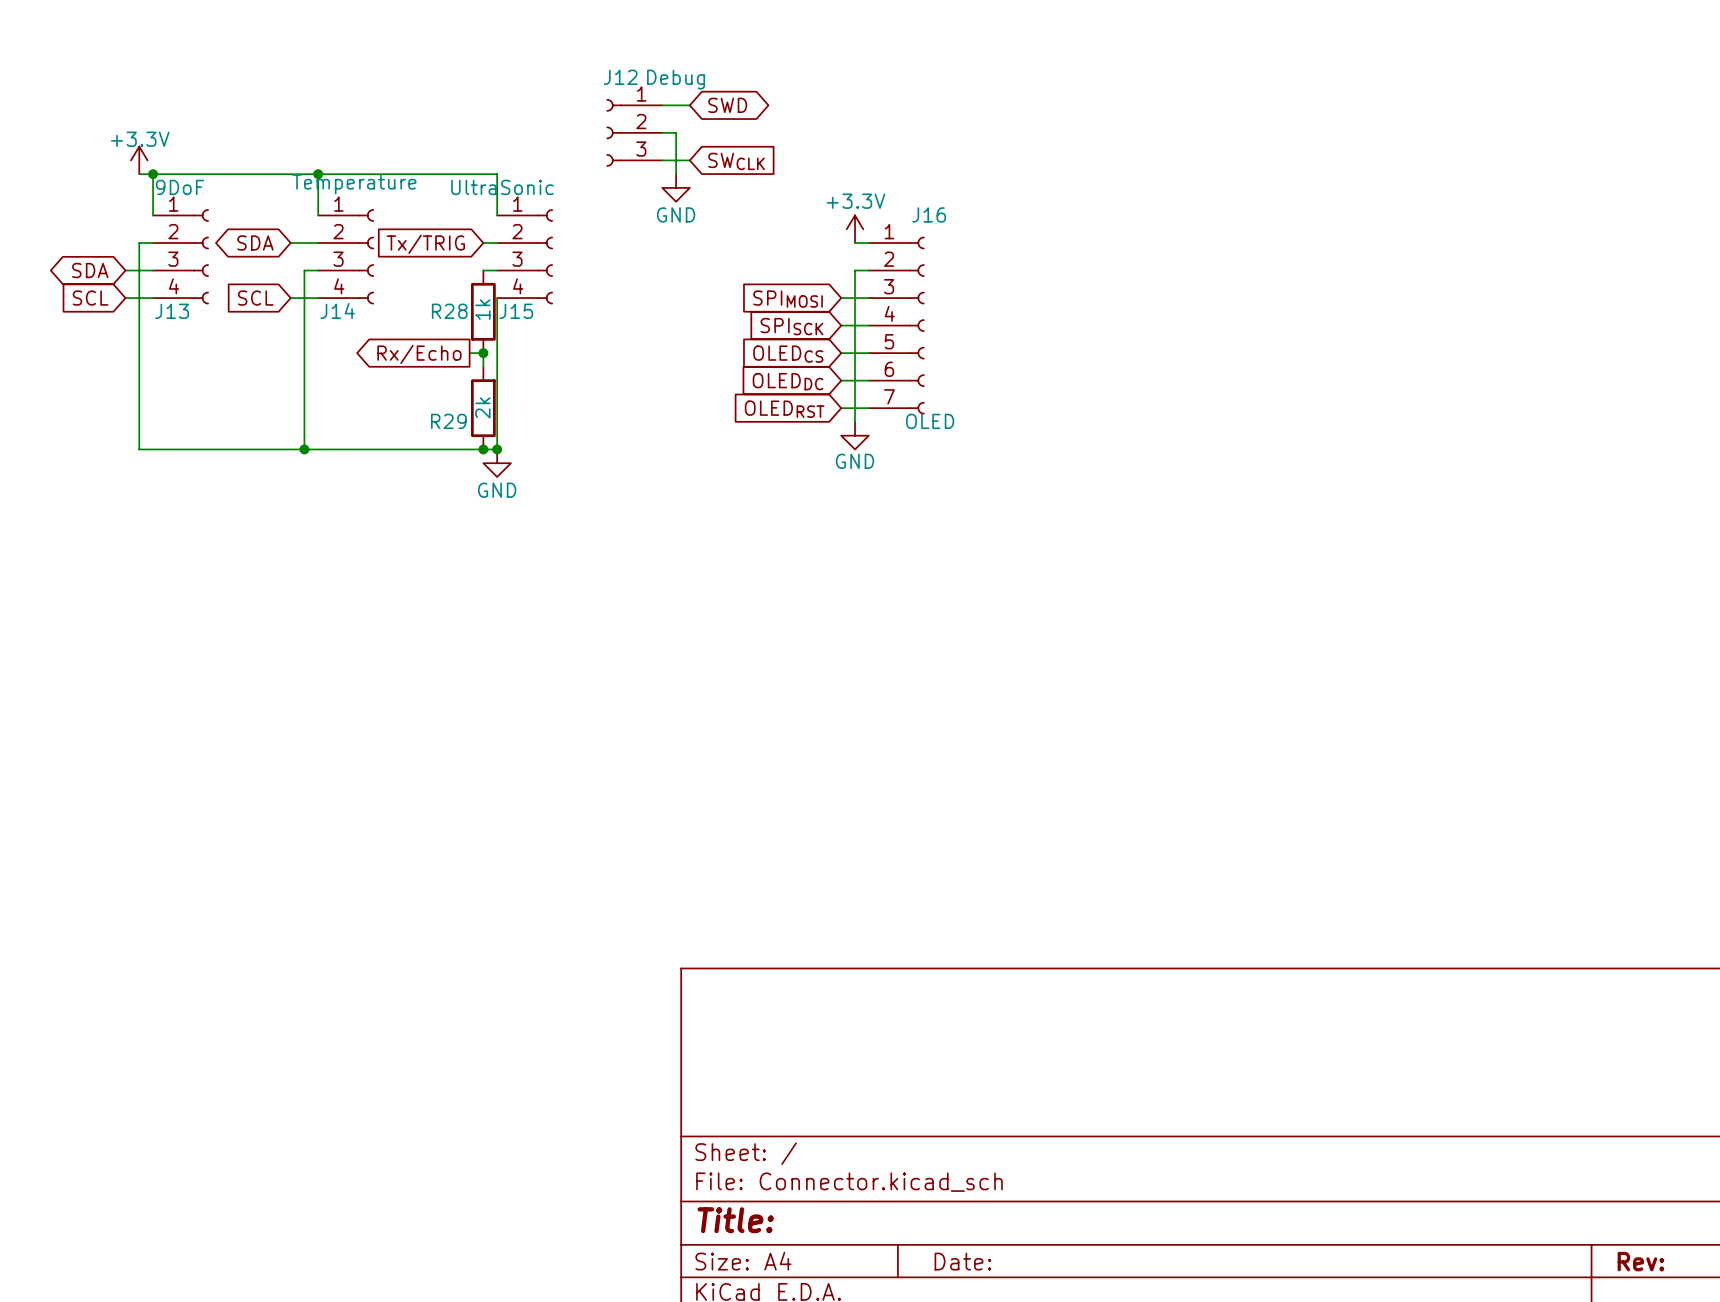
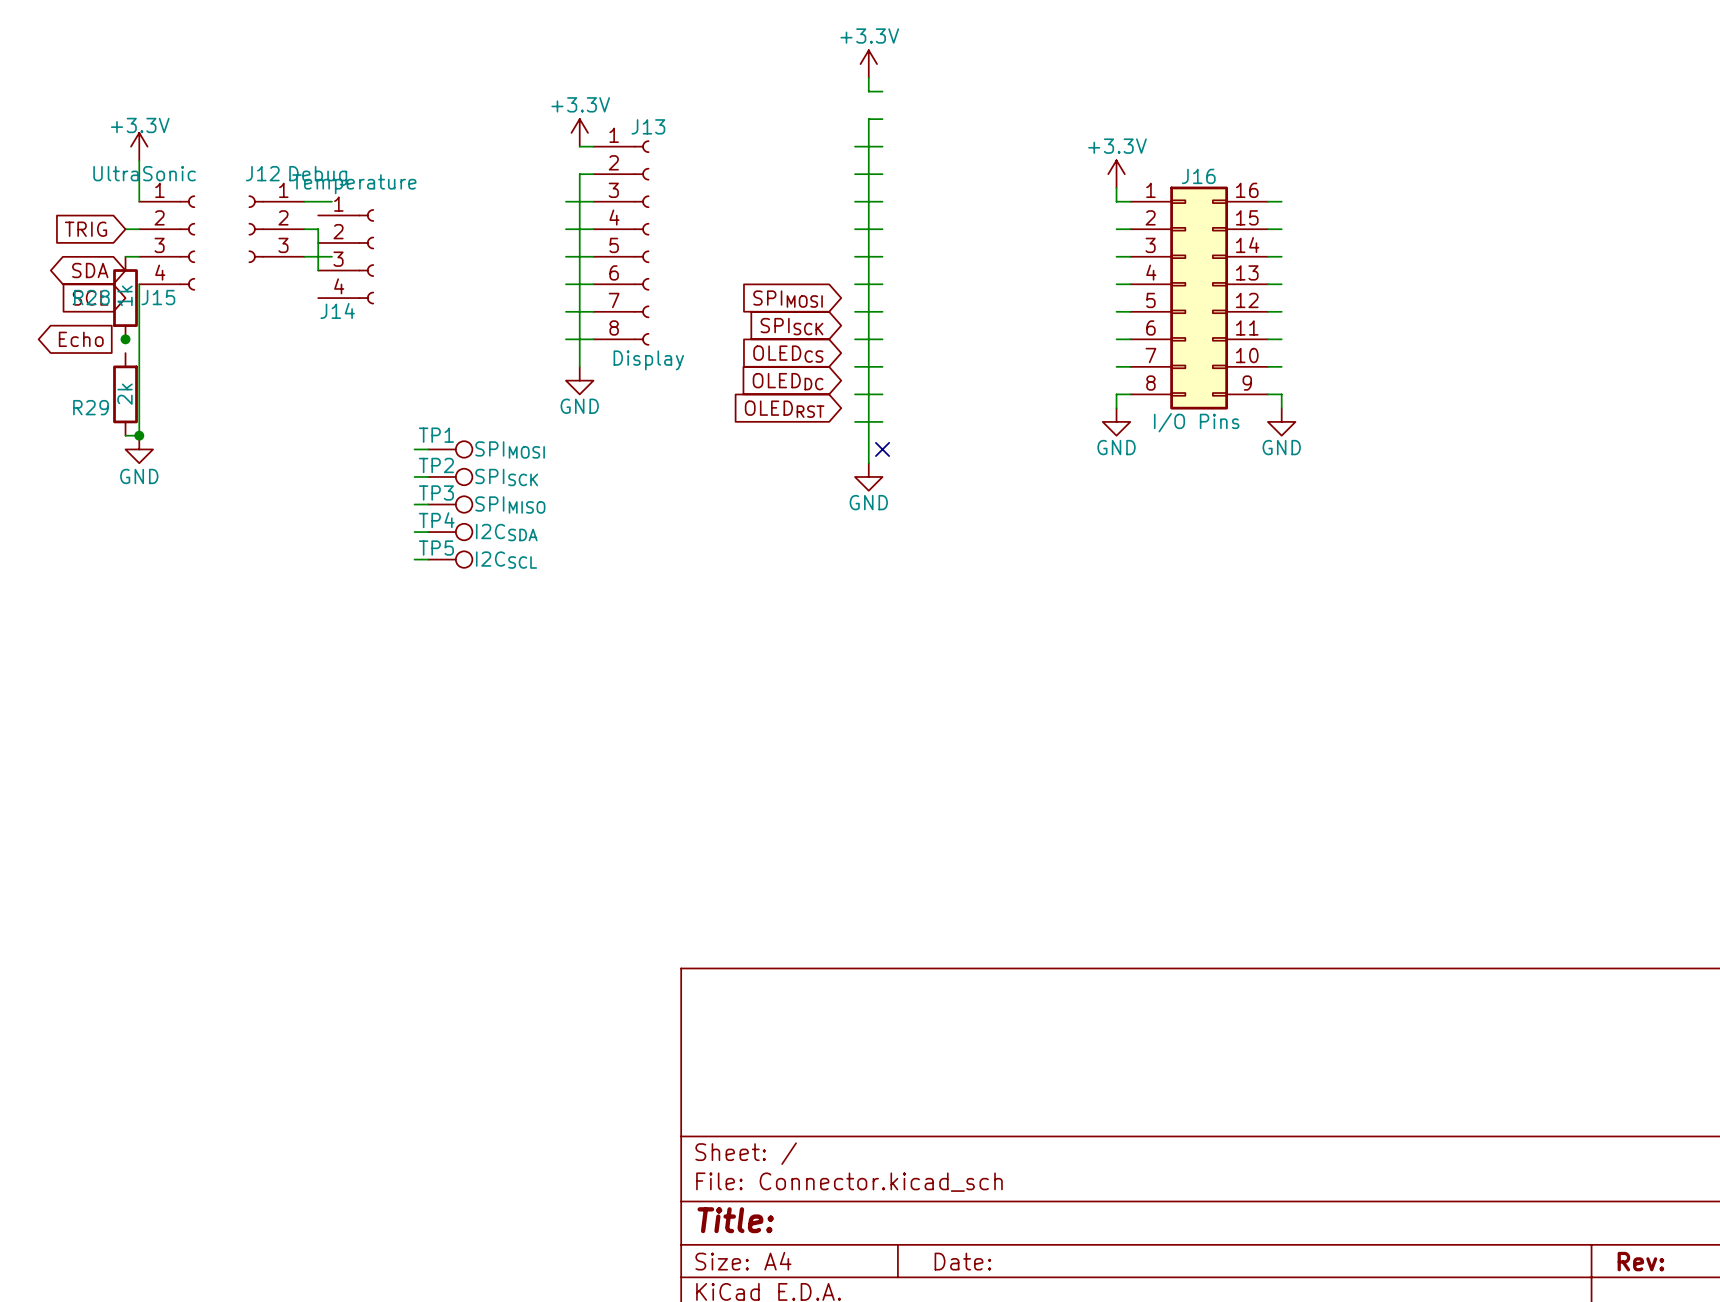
power symbol: none -> +3.3V (868, 64)
wire: none -> (868, 77) (868, 91) (882, 91)
wire: (662, 105) (689, 105) -> (565, 201) (593, 201)
global label: SWD (727, 105) -> none
wire: none -> (882, 119) (868, 119) (868, 463)
power symbol: none -> +3.3V (579, 132)
J12 position: (634, 132) -> (276, 229)
wire: (662, 132) (676, 132) (676, 174) -> none
wire: none -> (579, 146) (593, 146)
wire: none -> (855, 146) (882, 146)
power symbol position: +3.3V (139, 160) -> +3.3V (139, 146)
wire: (662, 160) (689, 160) -> (565, 256) (593, 256)
global label: SWCLK (736, 161) -> none
wire: (139, 174) (497, 174) (497, 215) -> none
wire: (153, 174) (153, 215) -> (139, 160) (139, 201)
junction: (153, 174) -> none
wire: (318, 174) (318, 215) -> none
junction: (318, 174) -> none
wire: none -> (593, 174) (579, 174) (579, 366)
wire: none -> (855, 174) (882, 174)
power symbol: none -> +3.3V (1116, 174)
J13 value: 9DoF (180, 187) -> Display (648, 360)
power symbol: GND (676, 187) -> none
wire: none -> (1116, 187) (1116, 201) (1130, 201)
wire: none -> (855, 201) (882, 201)
wire: none -> (1267, 201) (1281, 201)
J13 symbol: [153, 209, 209, 305] -> [593, 140, 650, 346]
J16 name position: J16 (929, 214) -> J16 (1198, 176)
global label: none -> TRIG (86, 229)
wire: none -> (125, 229) (139, 229)
wire: none -> (565, 229) (593, 229)
wire: none -> (855, 229) (882, 229)
power symbol: +3.3V (855, 229) -> none
wire: none -> (1267, 229) (1281, 229)
J16 symbol: [868, 236, 925, 415] -> [1130, 186, 1268, 410]
wire: (153, 242) (139, 242) (139, 284) -> none
global label: SDA (255, 242) -> none
wire: (290, 242) (318, 242) -> (304, 201) (331, 201)
wire: (483, 242) (497, 242) -> (414, 476) (428, 476)
wire: (855, 242) (868, 242) -> (1116, 229) (1130, 229)
global label: Tx/TRIG (425, 244) -> none
wire: none -> (125, 256) (139, 256)
J15 position: (525, 256) -> (167, 242)
wire: none -> (1116, 256) (1130, 256)
wire: none -> (1267, 256) (1281, 256)
wire: (125, 270) (153, 270) -> none
wire: (318, 270) (304, 270) (304, 449) -> (318, 270) (318, 229) (304, 229)
wire: (483, 270) (497, 270) -> (414, 504) (428, 504)
wire: (868, 270) (855, 270) (855, 421) -> (882, 421) (855, 421)
wire: none -> (565, 284) (593, 284)
wire: none -> (1116, 284) (1130, 284)
wire: none -> (1267, 284) (1281, 284)
wire: (125, 298) (153, 298) -> none
global label: SCL (255, 298) -> none
wire: (290, 298) (318, 298) -> (304, 256) (331, 256)
wire: (497, 298) (497, 449) (428, 449) -> none
wire: (841, 298) (868, 298) -> (855, 256) (882, 256)
J13 name position: J13 (172, 311) -> J13 (648, 126)
R28 position: (483, 311) -> (125, 298)
wire: none -> (565, 311) (593, 311)
wire: none -> (1116, 311) (1130, 311)
wire: none -> (1267, 311) (1281, 311)
wire: (841, 325) (868, 325) -> (855, 284) (882, 284)
global label: none -> Echo (81, 339)
junction: none -> (125, 339)
wire: none -> (565, 339) (593, 339)
wire: none -> (1116, 339) (1130, 339)
wire: none -> (1267, 339) (1281, 339)
wire: (469, 353) (483, 353) (483, 366) -> none
junction: (483, 353) -> none
wire: (841, 353) (868, 353) -> (855, 311) (882, 311)
global label: Rx/Echo (419, 354) -> none
wire: none -> (1116, 366) (1130, 366)
wire: none -> (1267, 366) (1281, 366)
power symbol: none -> GND (579, 380)
wire: (841, 380) (868, 380) -> (855, 339) (882, 339)
wire: none -> (855, 394) (882, 394)
wire: none -> (1130, 394) (1116, 394) (1116, 408)
wire: none -> (1267, 394) (1281, 394) (1281, 408)
R29 position: (483, 408) -> (125, 394)
wire: (841, 408) (868, 408) -> (855, 366) (882, 366)
J16 value: OLED (930, 421) -> I/O Pins (1196, 422)
power symbol: none -> GND (1116, 421)
power symbol: none -> GND (1281, 421)
wire: (139, 435) (139, 449) (414, 449) -> (139, 435) (125, 435)
junction: none -> (139, 435)
power symbol position: GND (855, 435) -> GND (868, 476)
power symbol: none -> GND (139, 449)
junction: (304, 449) -> none
TP1: none -> SPIMOSI (450, 449)
junction: (483, 449) -> none
junction: (497, 449) -> none
no-connect mark: none -> (882, 449)
power symbol: GND (497, 463) -> none
TP2: none -> SPISCK (450, 476)
TP3: none -> SPIMISO (450, 504)
wire: none -> (414, 532) (428, 532)
TP4: none -> I2CSDA (450, 532)
wire: none -> (414, 559) (428, 559)
TP5: none -> I2CSCL (450, 559)

